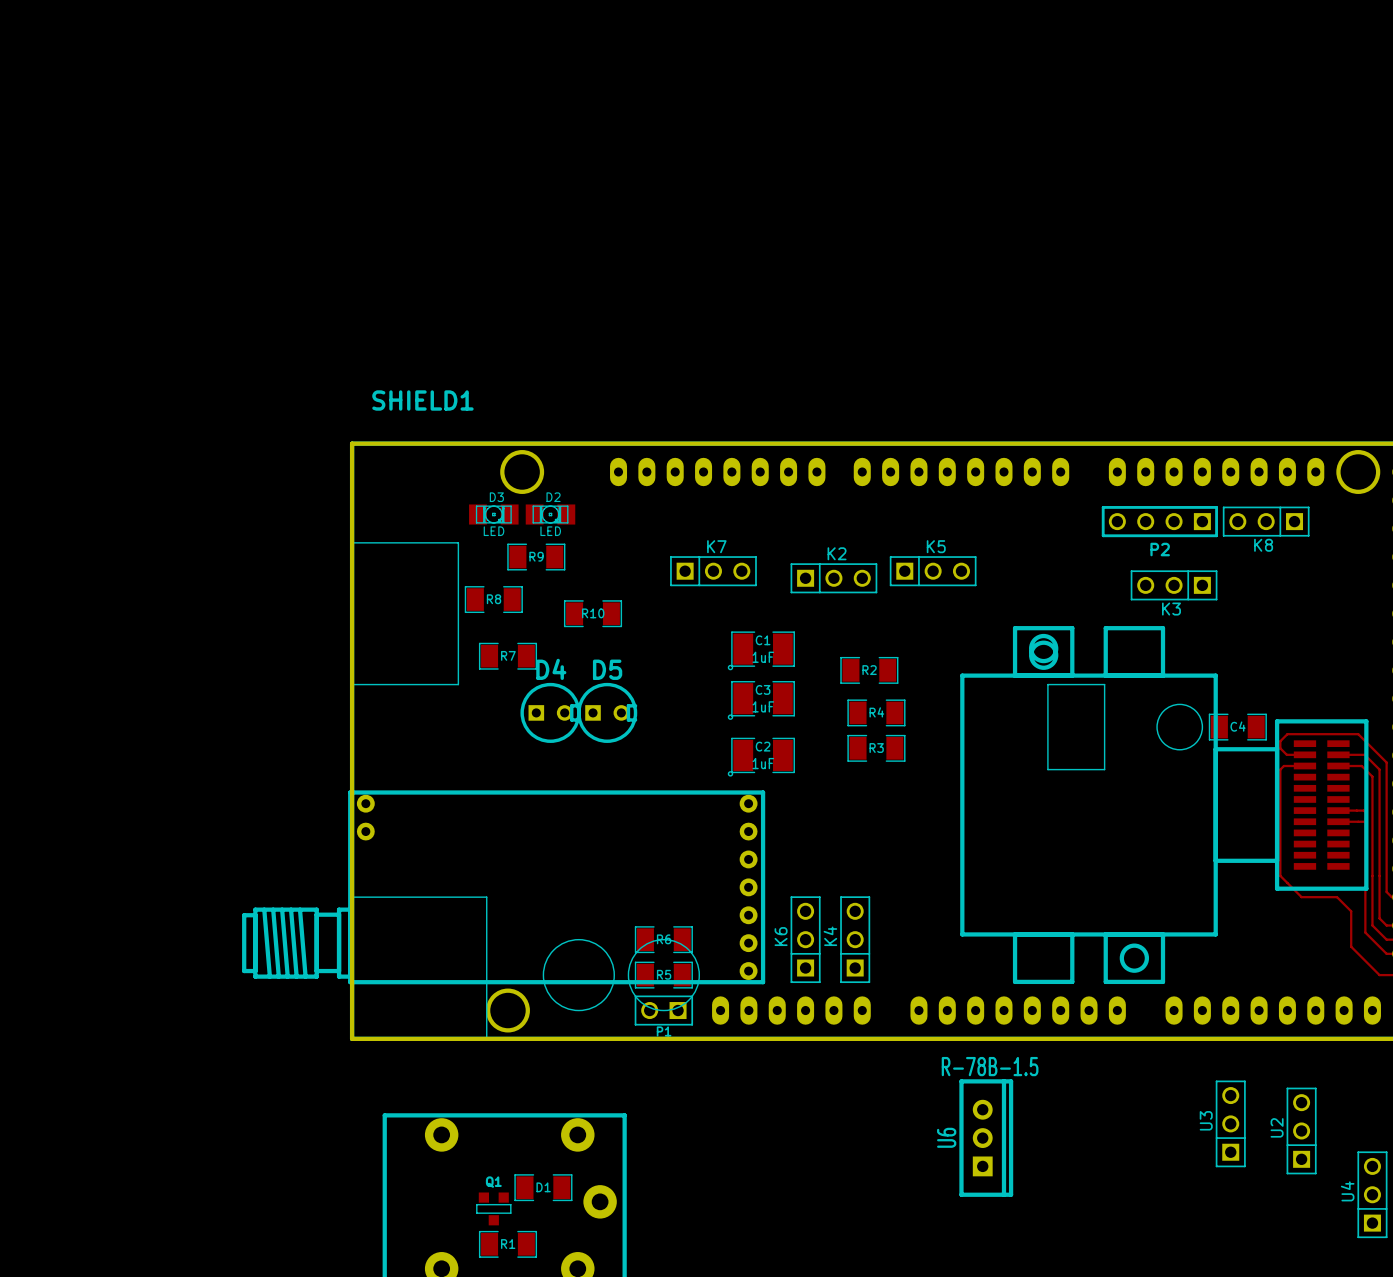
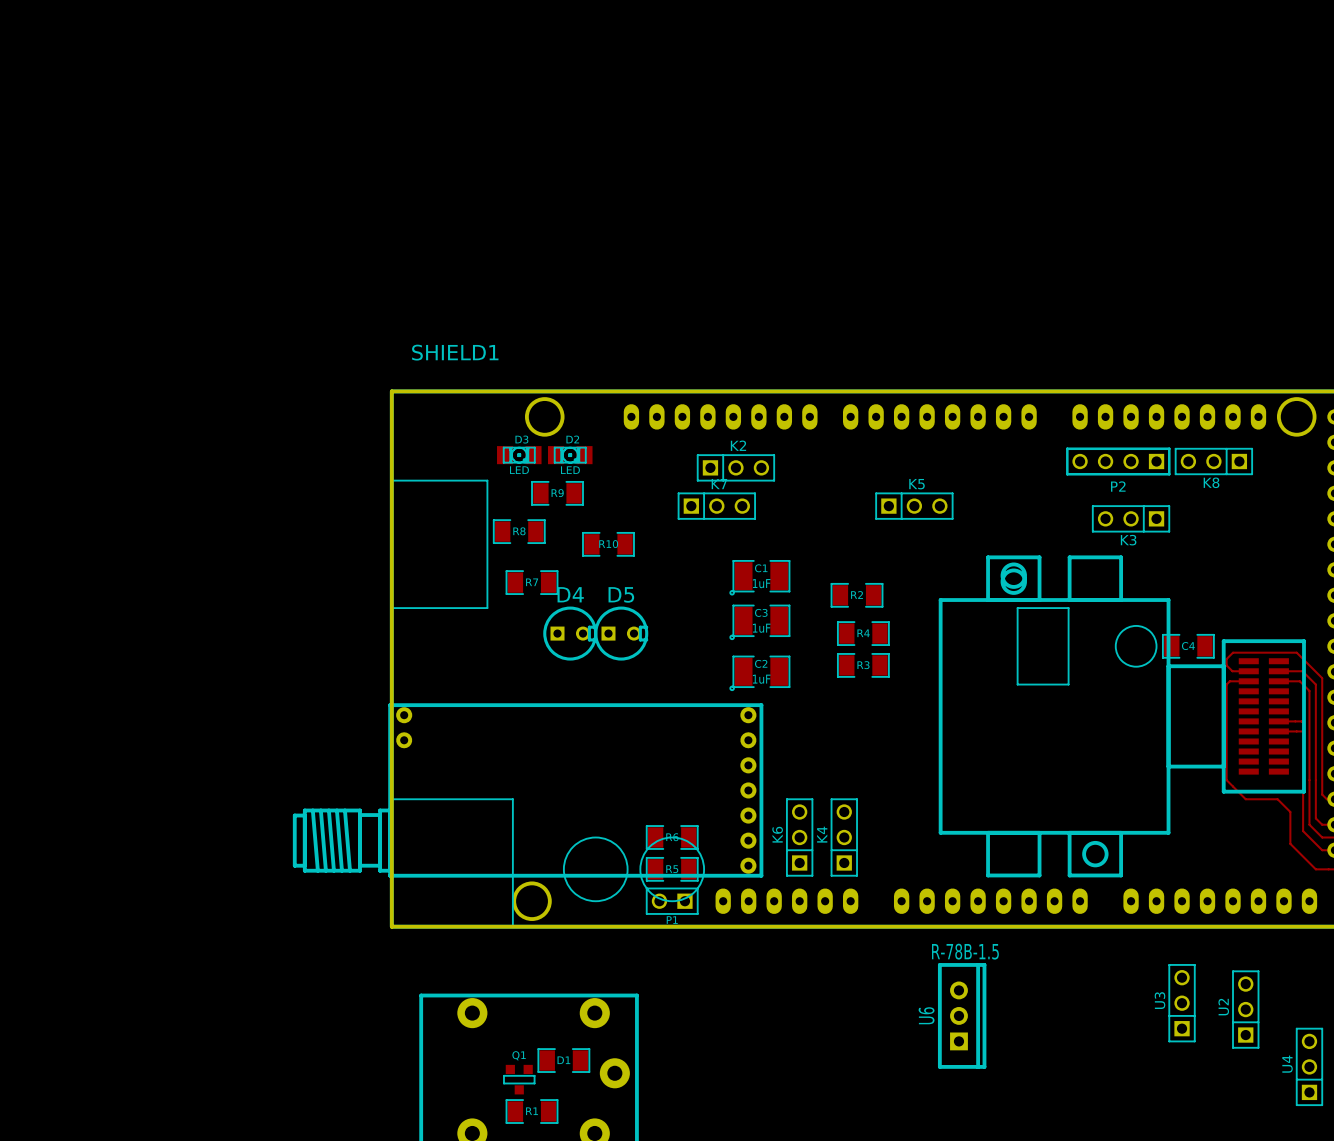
K2 position: (833, 578) -> (735, 467)

